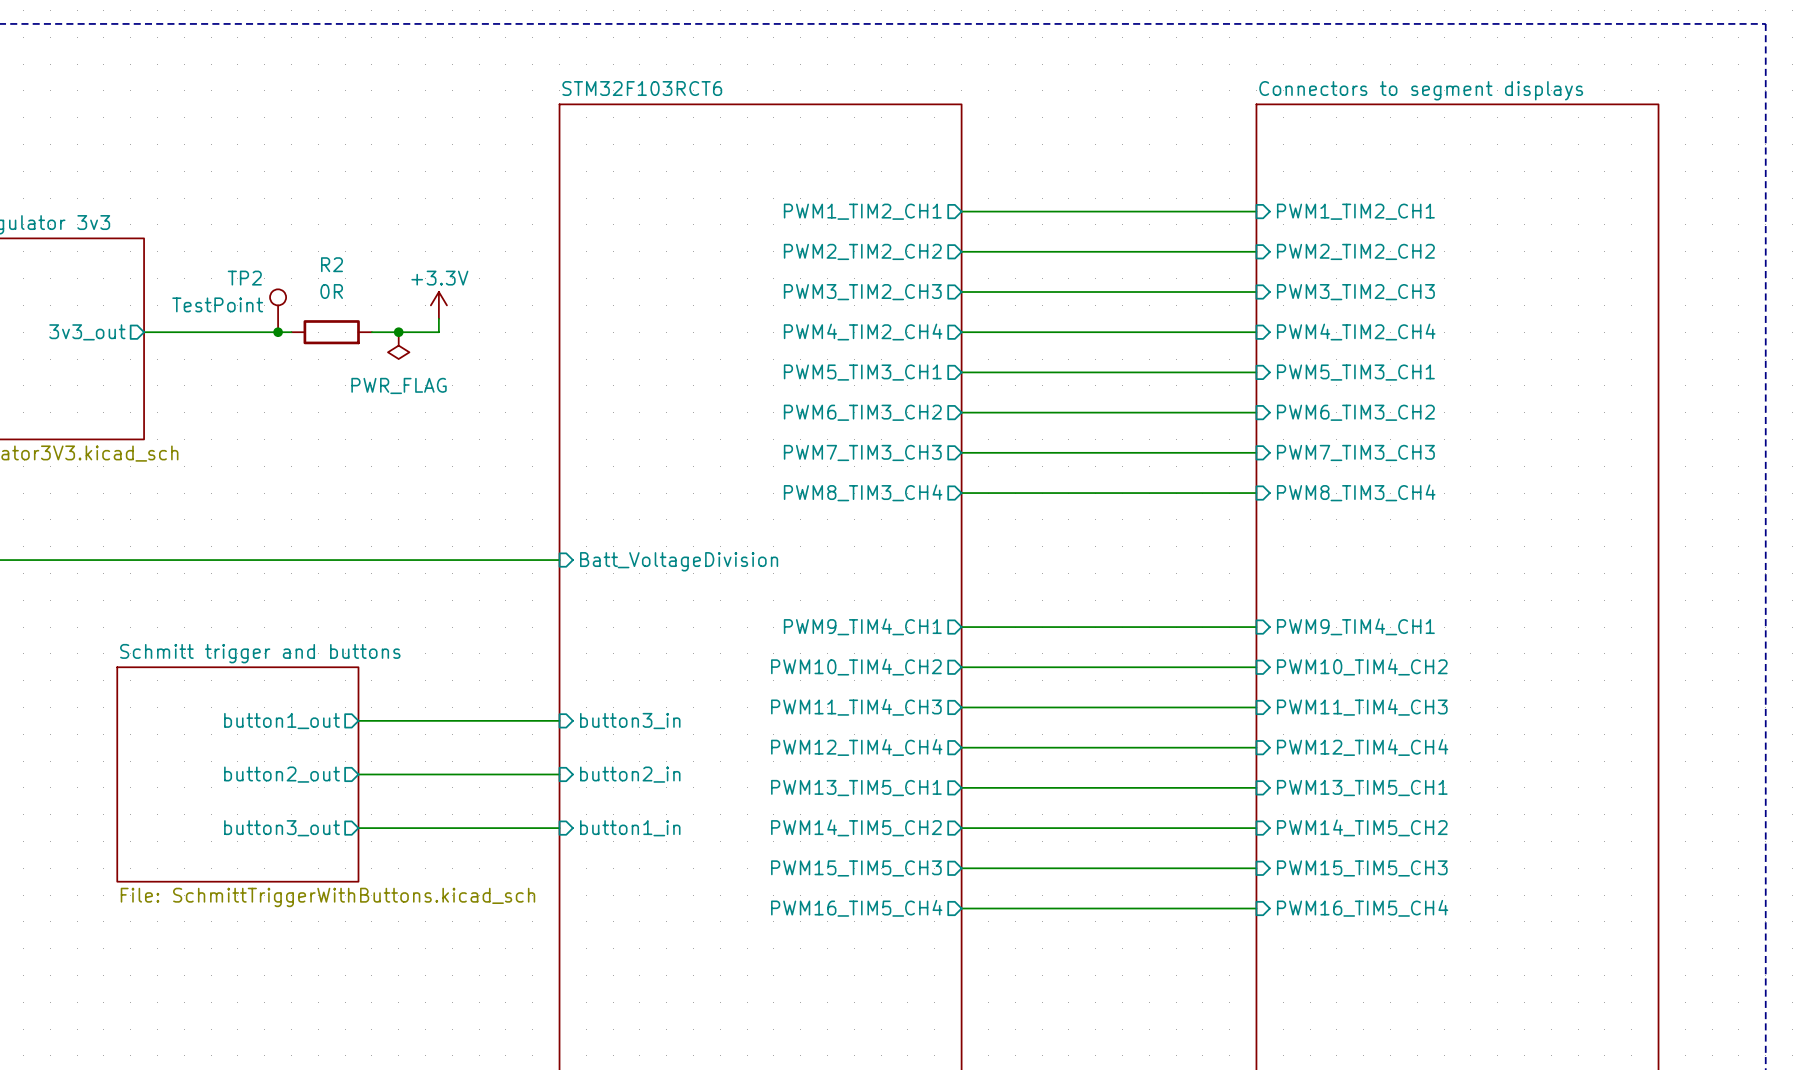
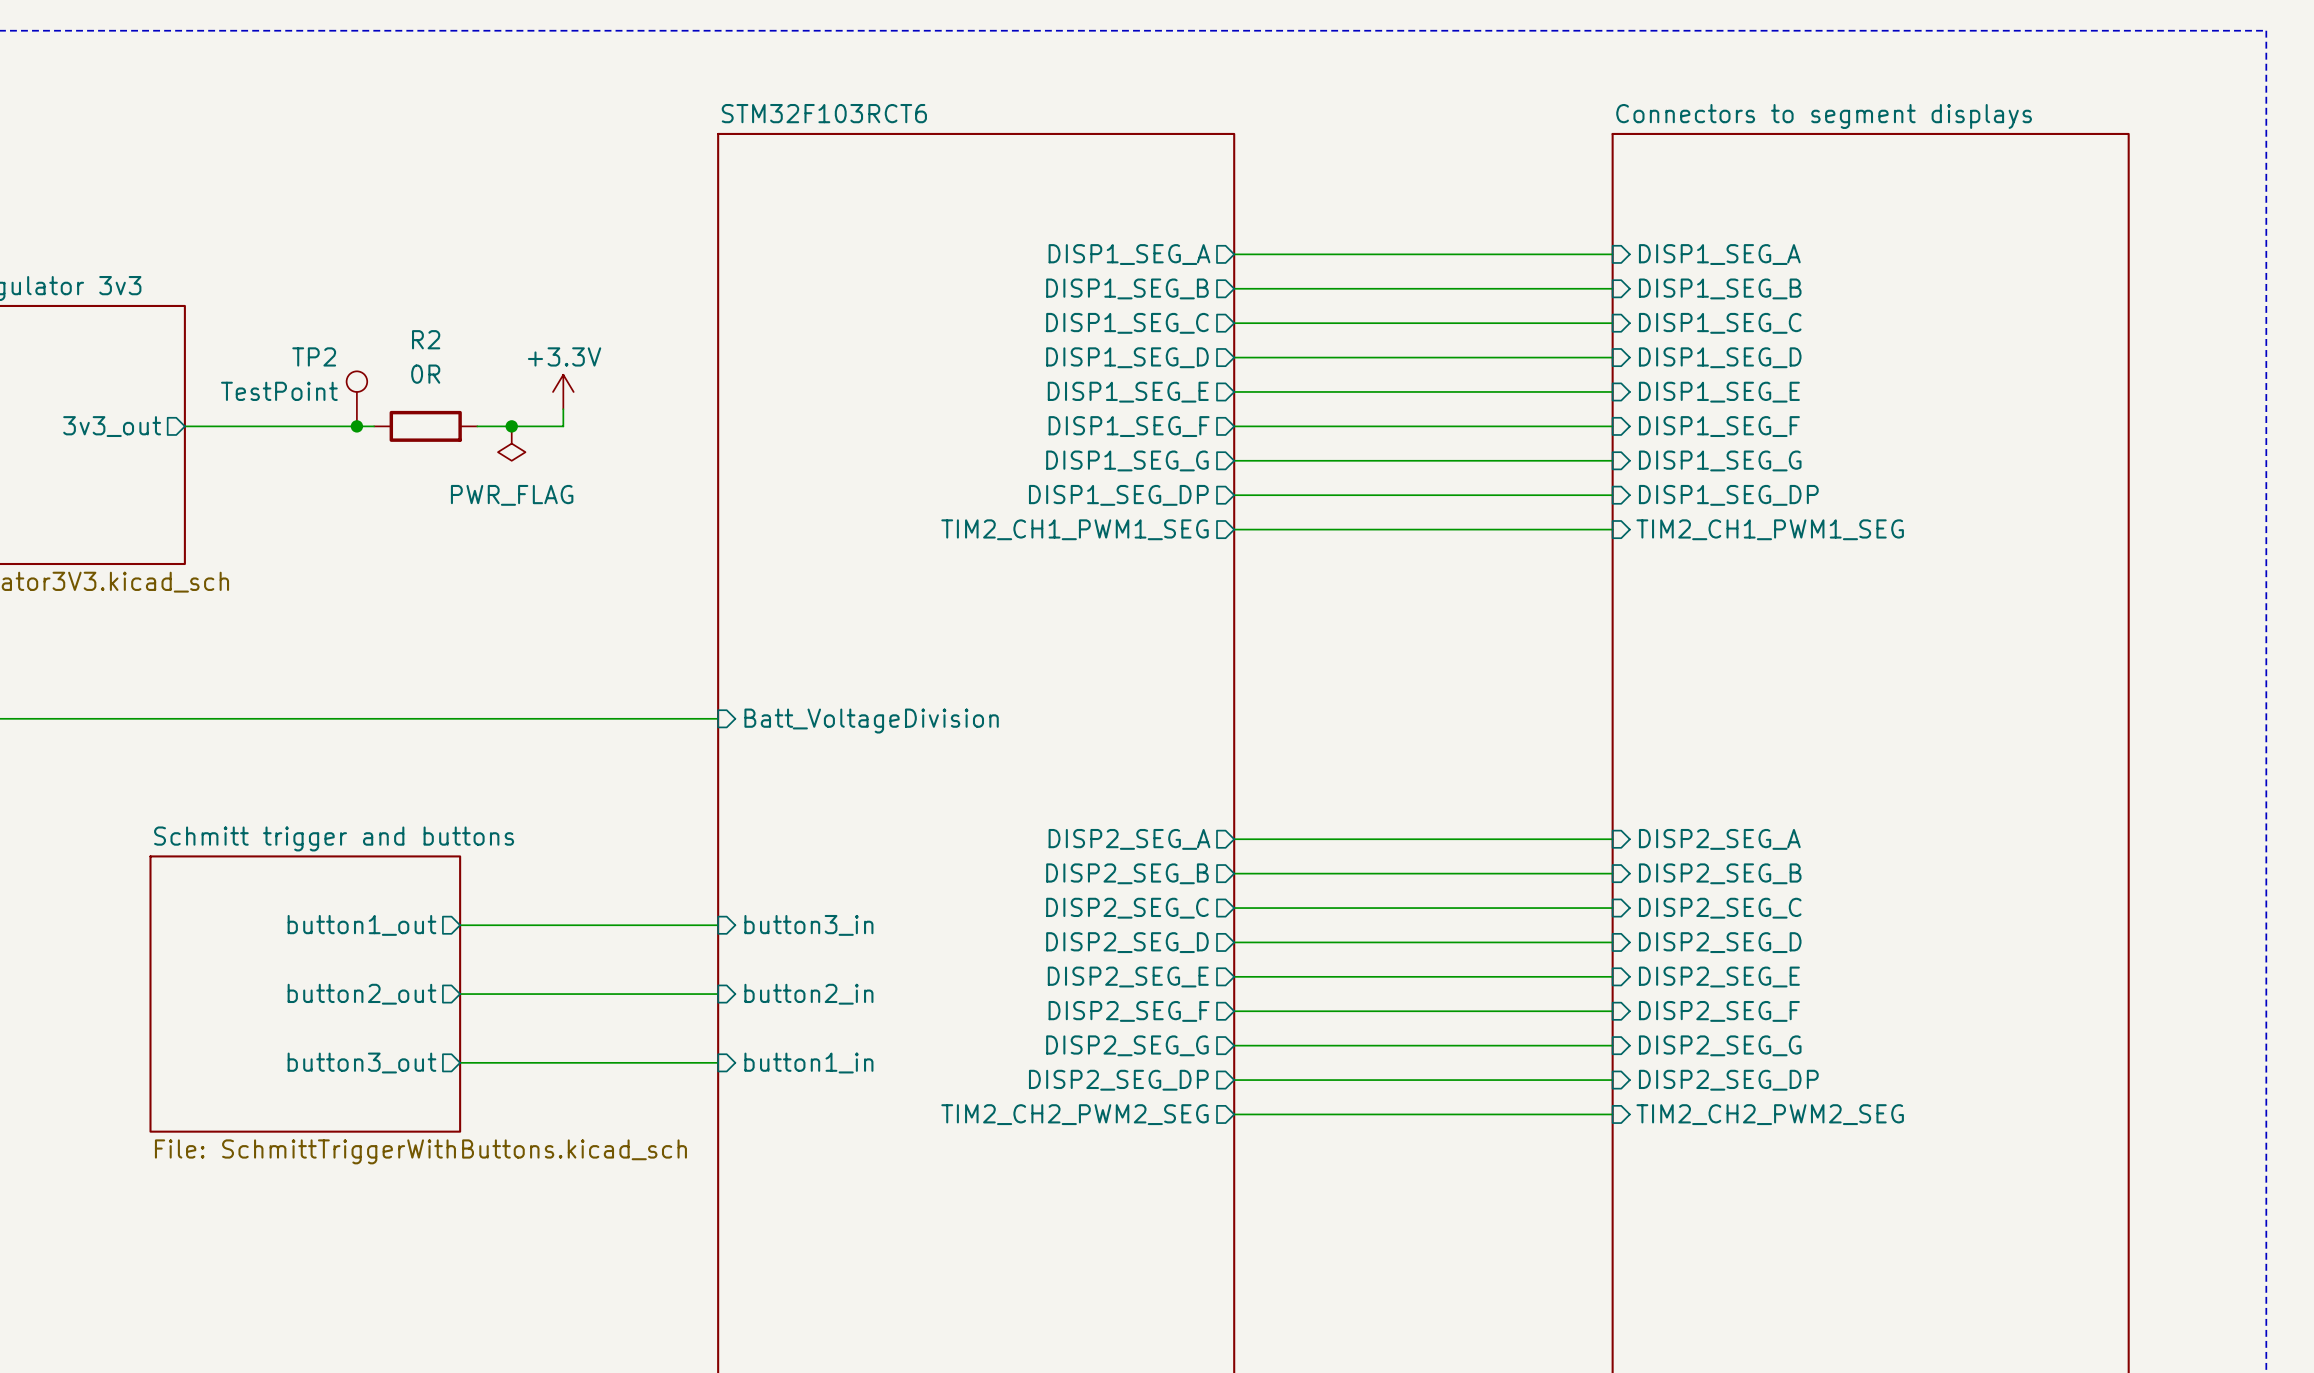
sheet pin: none -> DISP1_SEG_A (1129, 254)
sheet pin: none -> DISP1_SEG_A (1719, 254)
sheet pin: PWM1_TIM2_CH1 (862, 211) -> none
wire: (961, 211) (1256, 211) -> (1234, 254) (1612, 254)
sheet pin: PWM1_TIM2_CH1 (1355, 211) -> none
wire: none -> (1234, 288) (1612, 288)
sheet pin: none -> DISP1_SEG_B (1127, 288)
sheet pin: none -> DISP1_SEG_B (1720, 288)
sheet pin: PWM2_TIM2_CH2 (862, 251) -> DISP1_SEG_C (1127, 323)
sheet pin: PWM2_TIM2_CH2 (1355, 251) -> DISP1_SEG_C (1720, 323)
sheet pin: none -> DISP1_SEG_D (1127, 357)
wire: none -> (1234, 357) (1612, 357)
sheet pin: none -> DISP1_SEG_D (1720, 357)
sheet pin: PWM3_TIM2_CH3 (862, 292) -> none
wire: (961, 292) (1256, 292) -> (1234, 391) (1612, 391)
sheet pin: PWM3_TIM2_CH3 (1355, 292) -> none
sheet pin: none -> DISP1_SEG_E (1128, 392)
sheet pin: none -> DISP1_SEG_E (1719, 392)
sheet pin: PWM4_TIM2_CH4 (863, 332) -> DISP1_SEG_F (1129, 426)
sheet pin: PWM4_TIM2_CH4 (1356, 332) -> DISP1_SEG_F (1719, 426)
sheet pin: none -> DISP1_SEG_G (1127, 460)
sheet pin: none -> DISP1_SEG_G (1720, 460)
sheet pin: PWM5_TIM3_CH1 (862, 372) -> none
wire: (961, 372) (1256, 372) -> (1234, 460) (1612, 460)
sheet pin: PWM5_TIM3_CH1 (1355, 372) -> none
sheet pin: none -> DISP1_SEG_DP (1118, 495)
sheet pin: none -> DISP1_SEG_DP (1728, 495)
sheet pin: PWM6_TIM3_CH2 (862, 412) -> TIM2_CH1_PWM1_SEG (1075, 529)
sheet pin: PWM6_TIM3_CH2 (1355, 412) -> TIM2_CH1_PWM1_SEG (1770, 529)
sheet pin: PWM7_TIM3_CH3 (862, 452) -> none
wire: (961, 452) (1256, 452) -> (1234, 495) (1612, 495)
sheet pin: PWM7_TIM3_CH3 (1355, 452) -> none
sheet pin: PWM8_TIM3_CH4 (863, 492) -> none
sheet pin: PWM8_TIM3_CH4 (1356, 492) -> none
wire: (961, 493) (1256, 493) -> (1234, 873) (1612, 873)
sheet pin: PWM9_TIM4_CH1 (862, 626) -> none
sheet pin: PWM9_TIM4_CH1 (1355, 626) -> none
wire: (961, 627) (1256, 627) -> (1234, 976) (1612, 976)
sheet pin: none -> DISP2_SEG_A (1129, 839)
sheet pin: none -> DISP2_SEG_A (1719, 839)
sheet pin: PWM10_TIM4_CH2 (856, 667) -> none
wire: (961, 667) (1256, 667) -> (1234, 839) (1612, 839)
sheet pin: PWM10_TIM4_CH2 (1362, 667) -> none
sheet pin: none -> DISP2_SEG_B (1127, 873)
sheet pin: none -> DISP2_SEG_B (1720, 873)
sheet pin: PWM11_TIM4_CH3 (856, 707) -> DISP2_SEG_C (1127, 908)
sheet pin: PWM11_TIM4_CH3 (1362, 707) -> DISP2_SEG_C (1720, 908)
sheet pin: none -> DISP2_SEG_D (1127, 942)
sheet pin: none -> DISP2_SEG_D (1720, 942)
sheet pin: PWM12_TIM4_CH4 (856, 747) -> none
wire: (961, 747) (1256, 747) -> (1234, 942) (1612, 942)
sheet pin: PWM12_TIM4_CH4 (1362, 747) -> none
sheet pin: none -> DISP2_SEG_E (1128, 977)
sheet pin: none -> DISP2_SEG_E (1719, 977)
sheet pin: PWM13_TIM5_CH1 (856, 788) -> DISP2_SEG_F (1129, 1011)
sheet pin: PWM13_TIM5_CH1 (1362, 788) -> DISP2_SEG_F (1719, 1011)
sheet pin: none -> DISP2_SEG_G (1127, 1045)
sheet pin: none -> DISP2_SEG_G (1720, 1045)
sheet pin: PWM14_TIM5_CH2 (856, 827) -> none
sheet pin: PWM14_TIM5_CH2 (1362, 827) -> none
wire: (961, 828) (1256, 828) -> (1234, 1080) (1612, 1080)
sheet pin: none -> DISP2_SEG_DP (1118, 1080)
sheet pin: none -> DISP2_SEG_DP (1728, 1080)
sheet pin: PWM15_TIM5_CH3 (856, 868) -> TIM2_CH2_PWM2_SEG (1075, 1114)
sheet pin: PWM15_TIM5_CH3 (1362, 868) -> TIM2_CH2_PWM2_SEG (1770, 1114)
sheet pin: PWM16_TIM5_CH4 (856, 908) -> none
wire: (961, 908) (1256, 908) -> (1234, 1045) (1612, 1045)
sheet pin: PWM16_TIM5_CH4 (1362, 908) -> none

